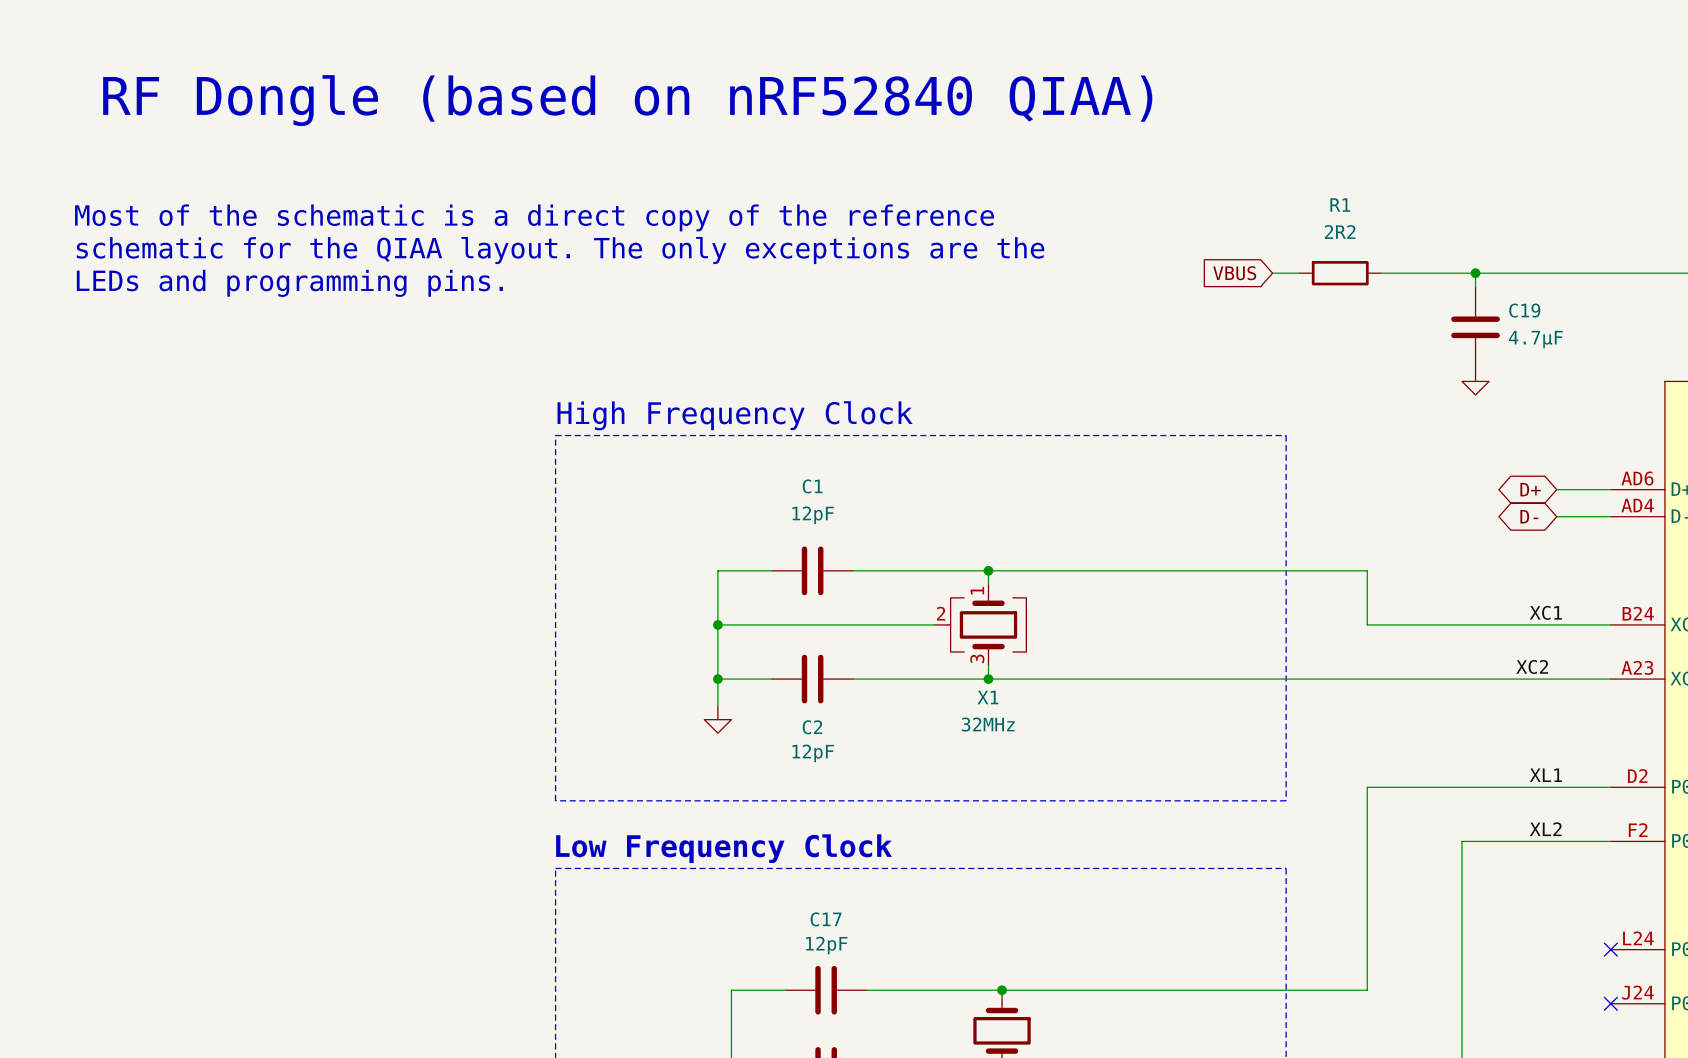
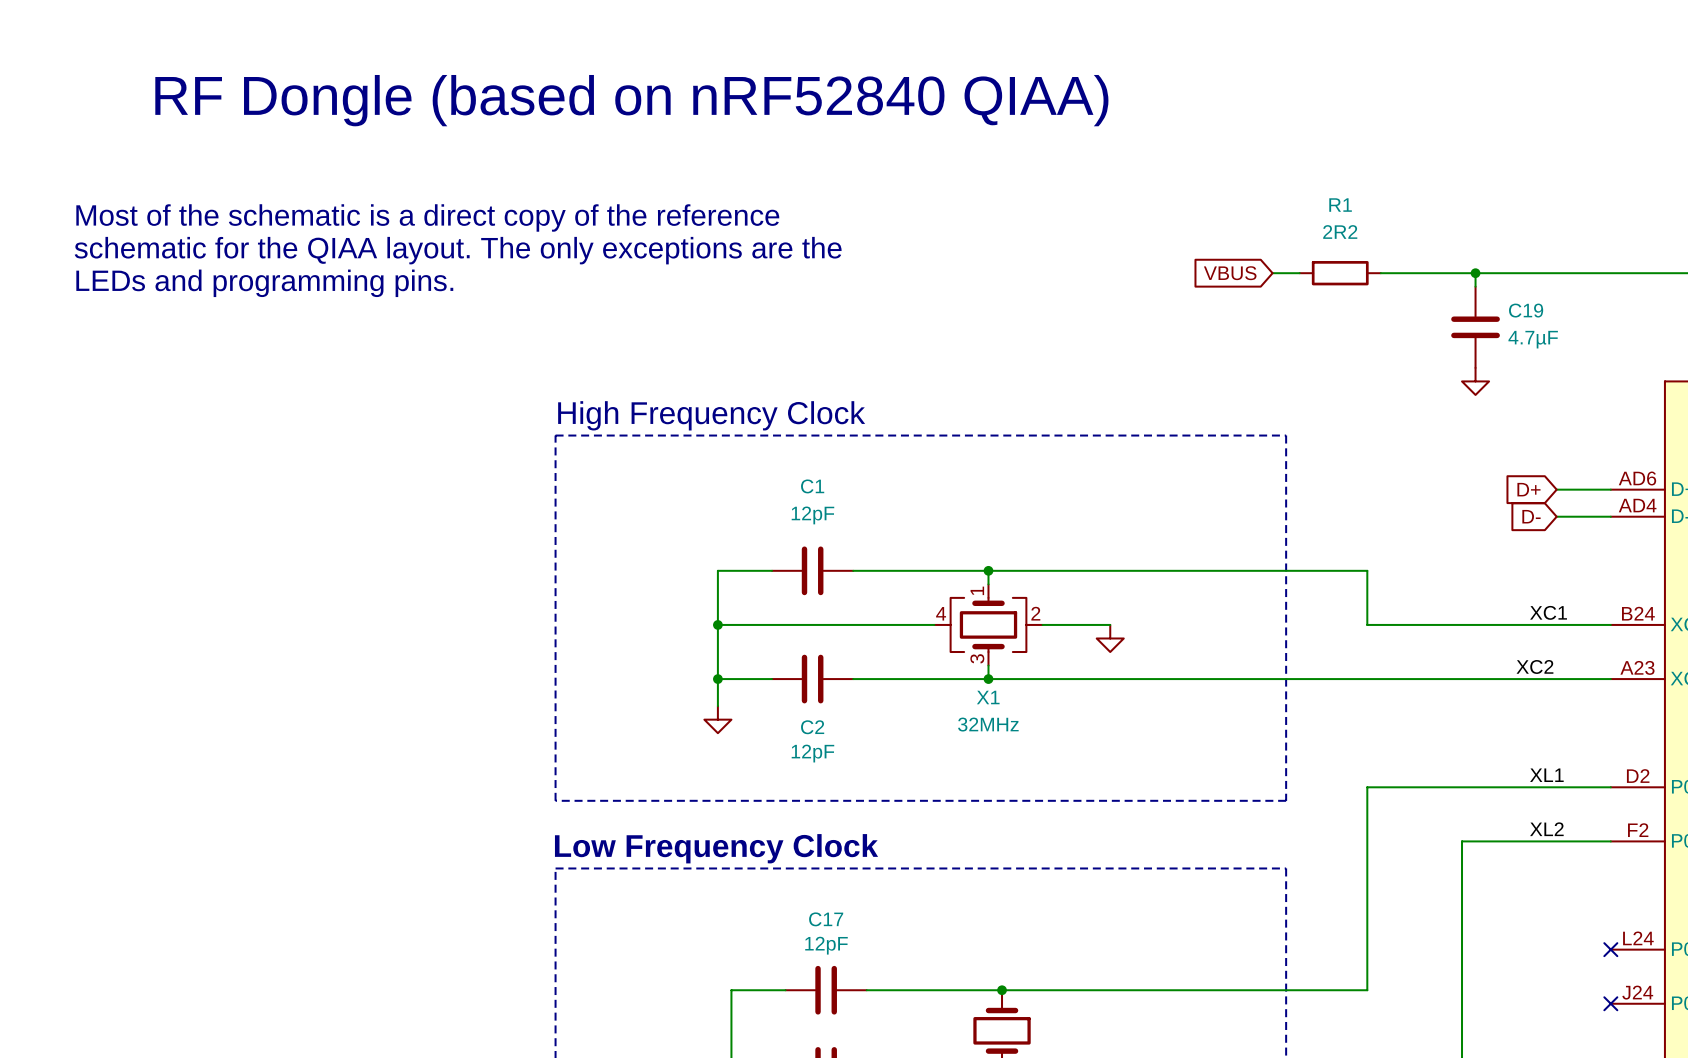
global label shape: bidirectional (1530, 489) -> input (1528, 489)
global label shape: bidirectional (1529, 516) -> input (1531, 516)
X1 symbol: [934, 584, 1027, 666] -> [934, 584, 1043, 666]
wire: none -> (1042, 624) (1110, 624)
power symbol: none -> (1110, 638)

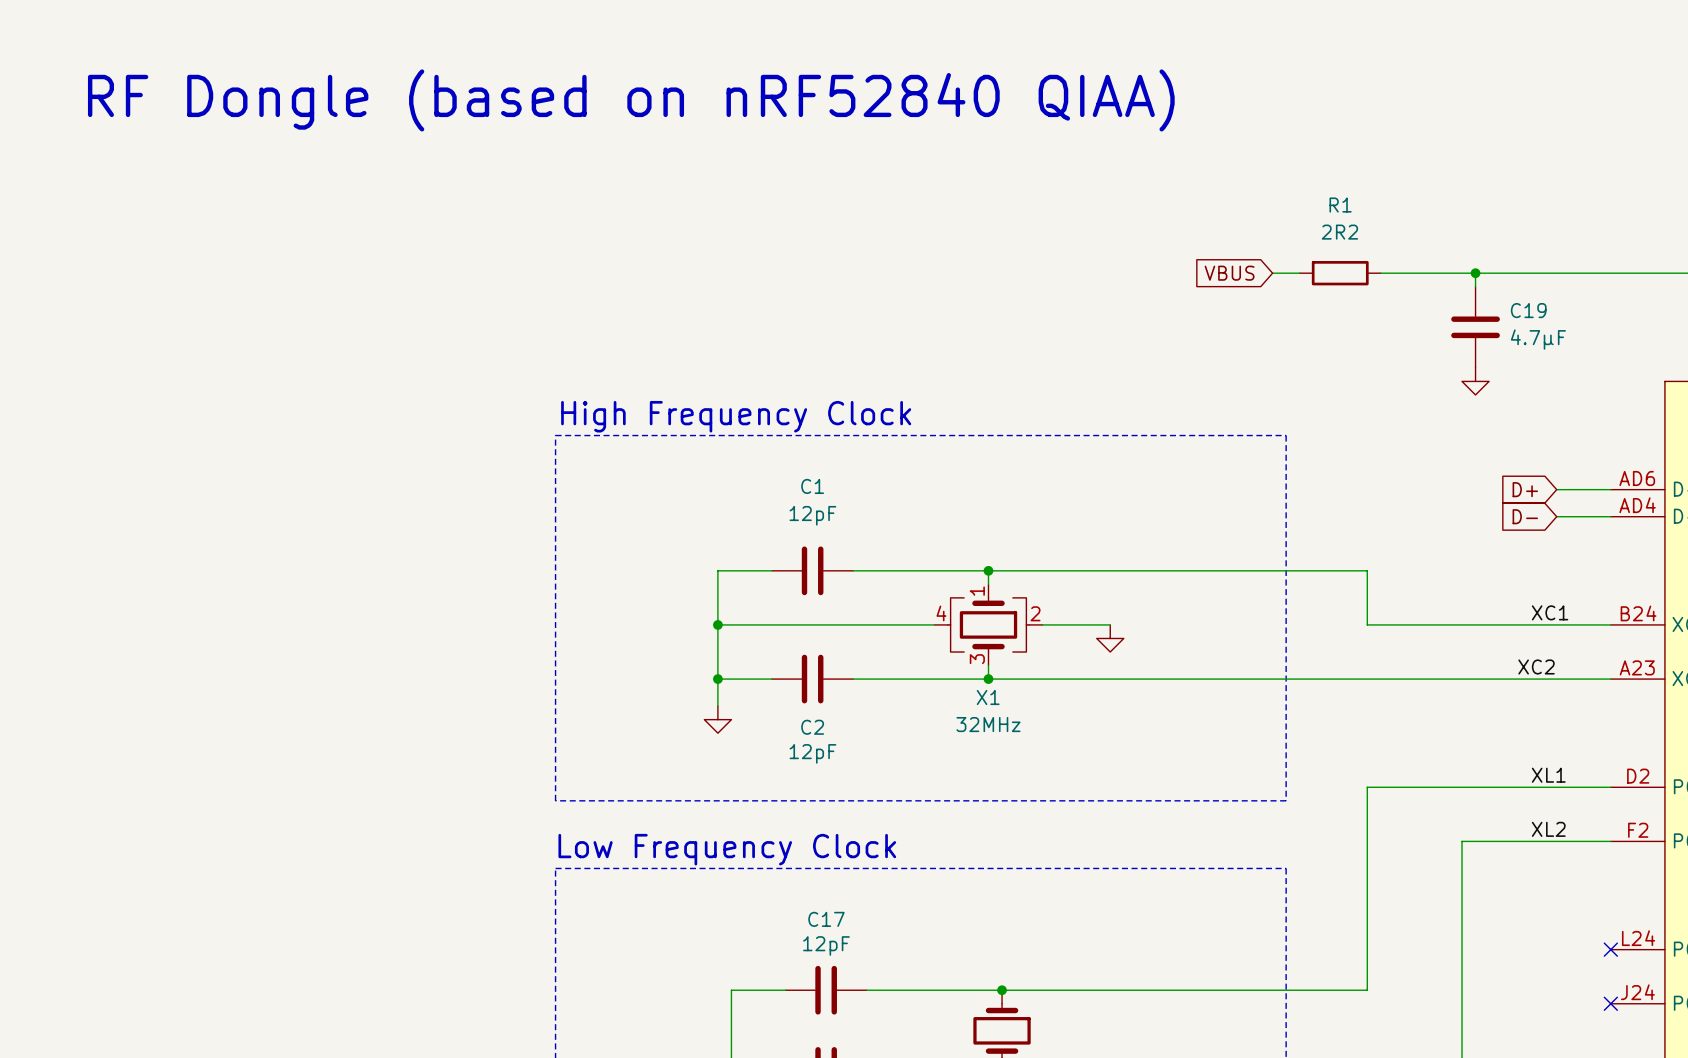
text: Most of the schematic is a direct copy of the reference (427, 217) -> none
text: schematic for the QIAA layout. The only exceptions are the (458, 250) -> none
text: LEDs and programming pins. (264, 283) -> none

